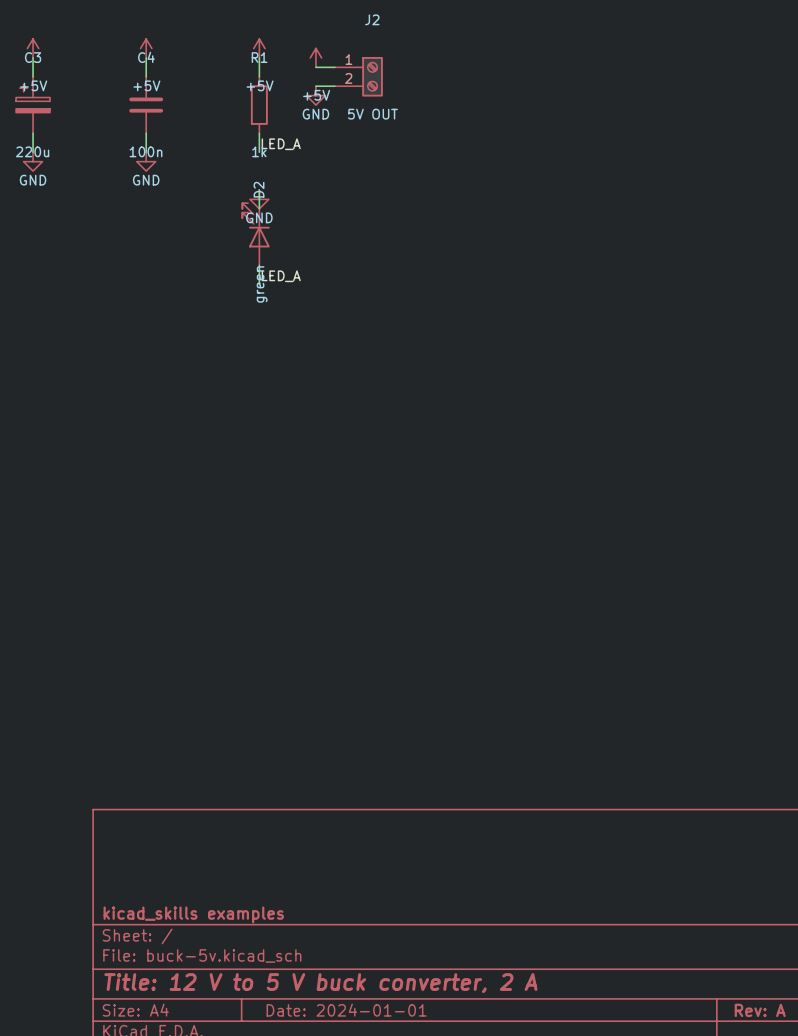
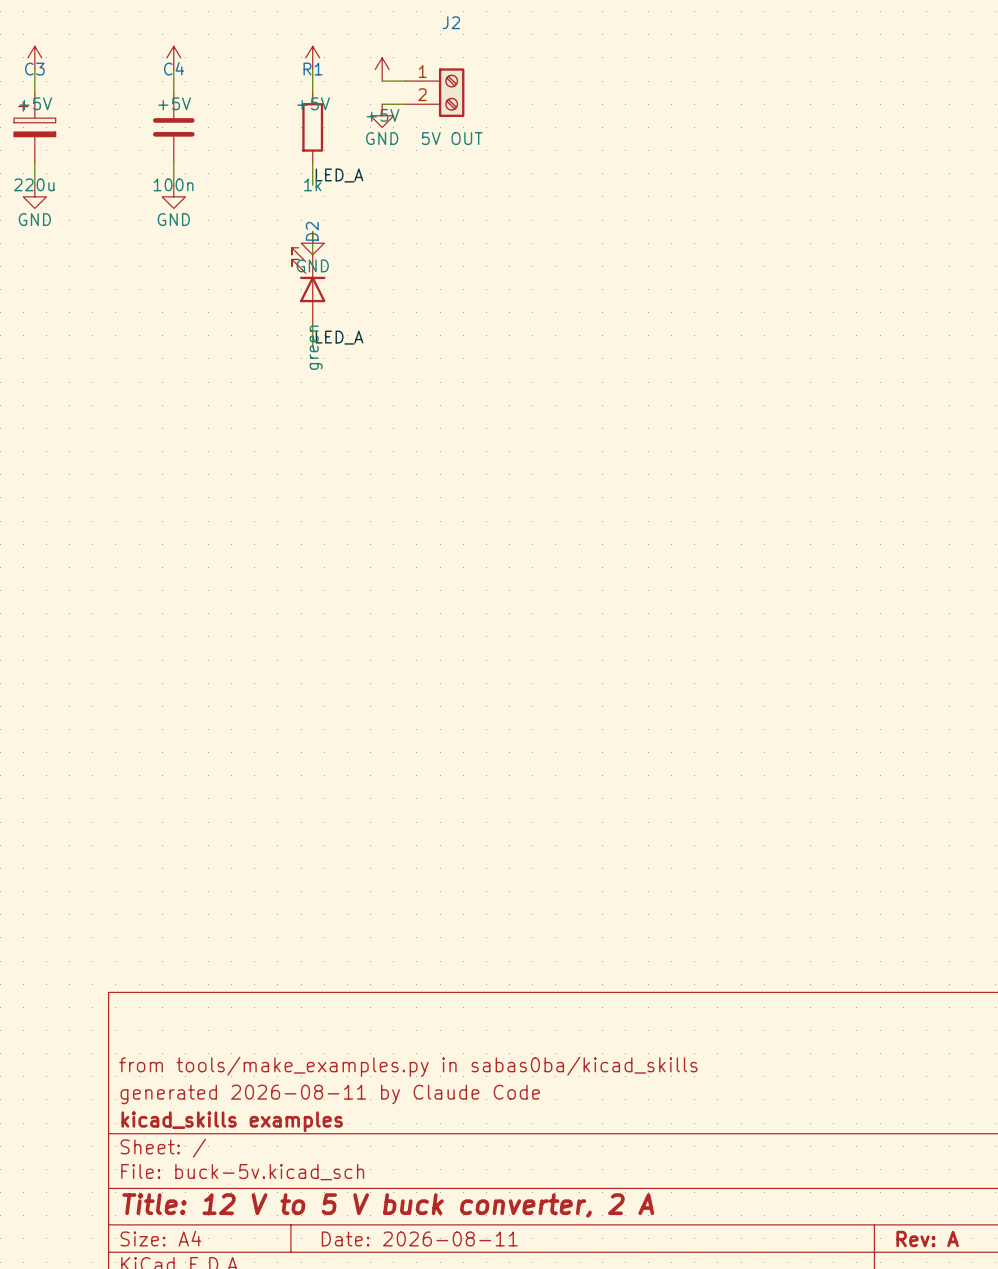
title block: none -> from tools/make_examples.py in sabas0ba/kicad_skills (408, 1066)
title block: none -> generated 2026-08-11 by Claude Code (330, 1094)
title block: Date: 2024-01-01 (346, 1010) -> Date: 2026-08-11 (419, 1238)

